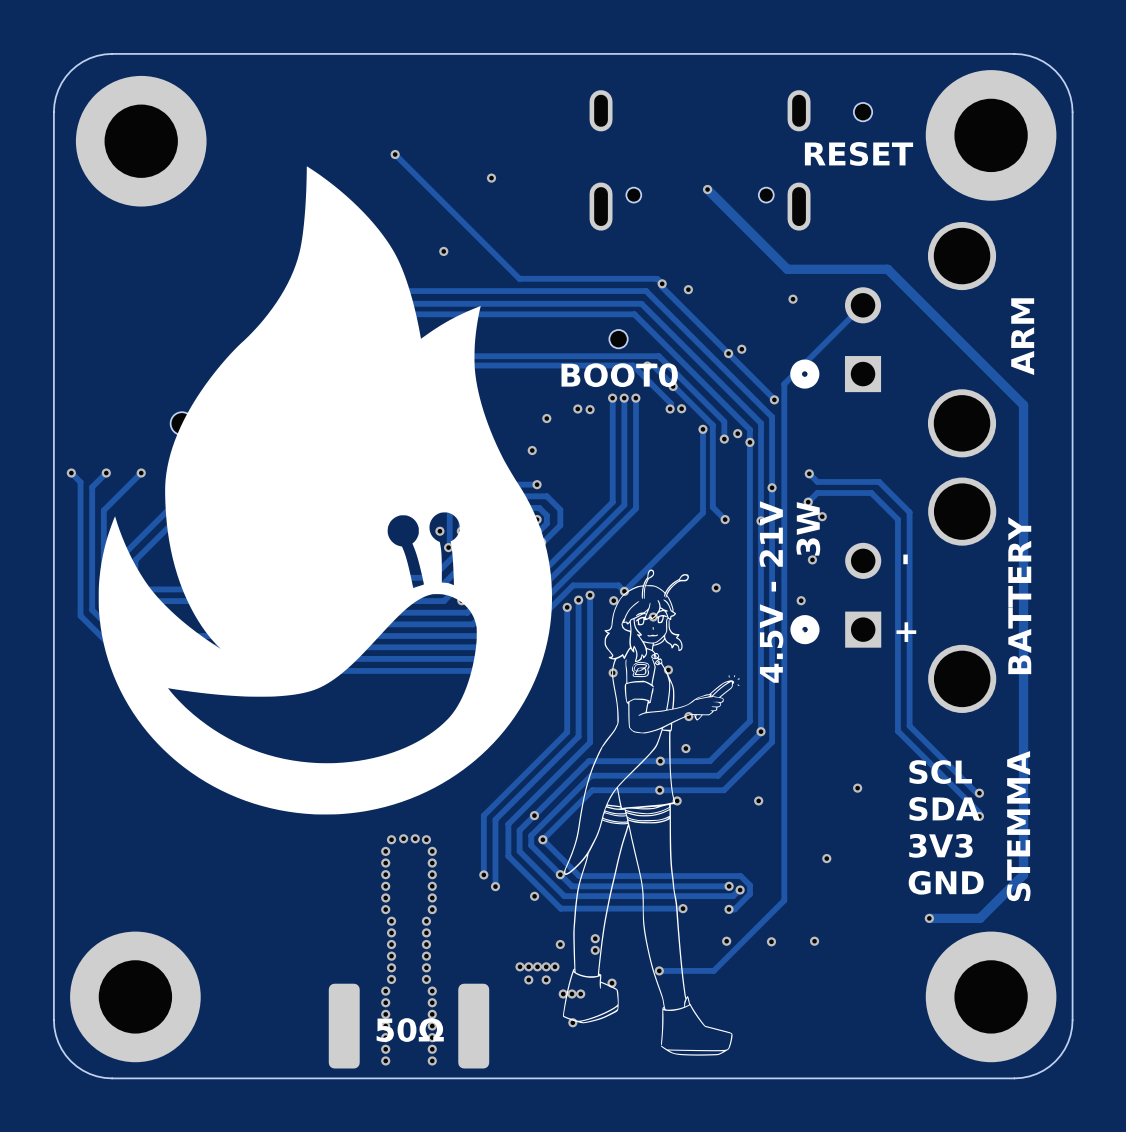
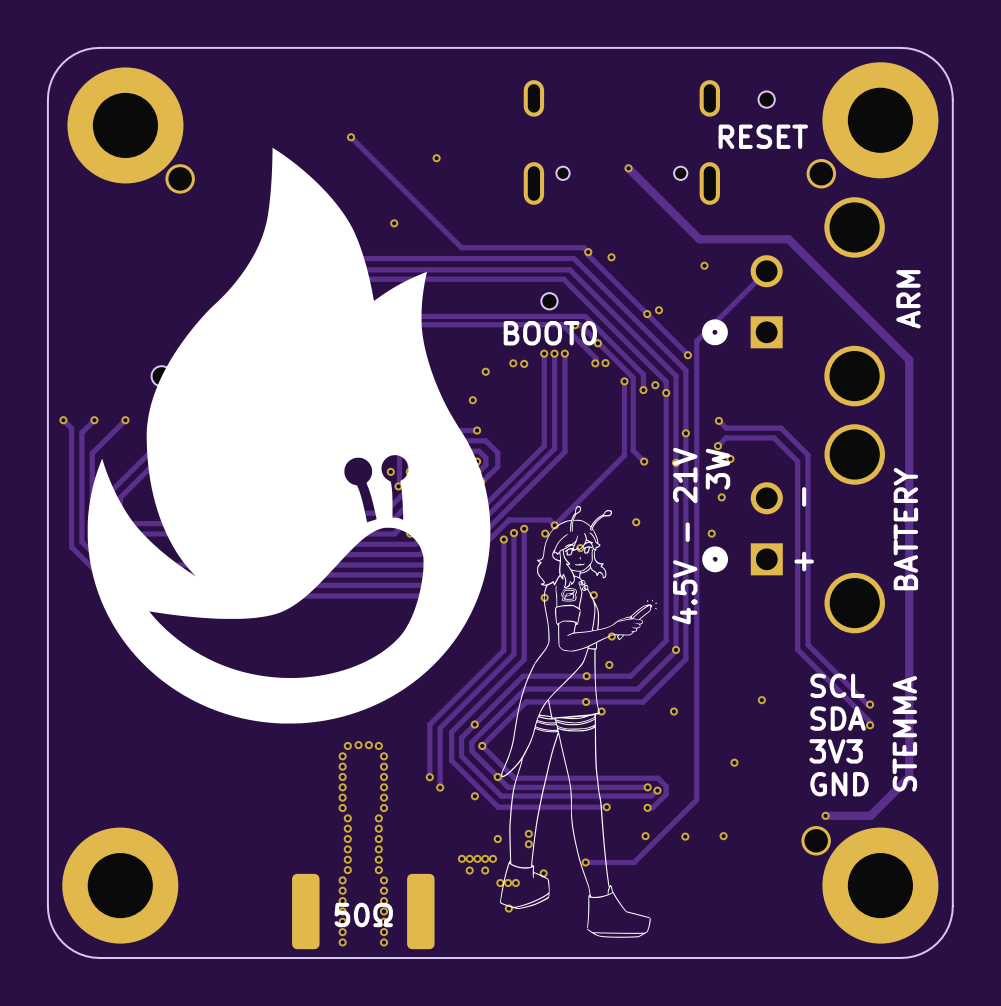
part: none -> (821, 173)
part: none -> (180, 178)
part: none -> (816, 840)

